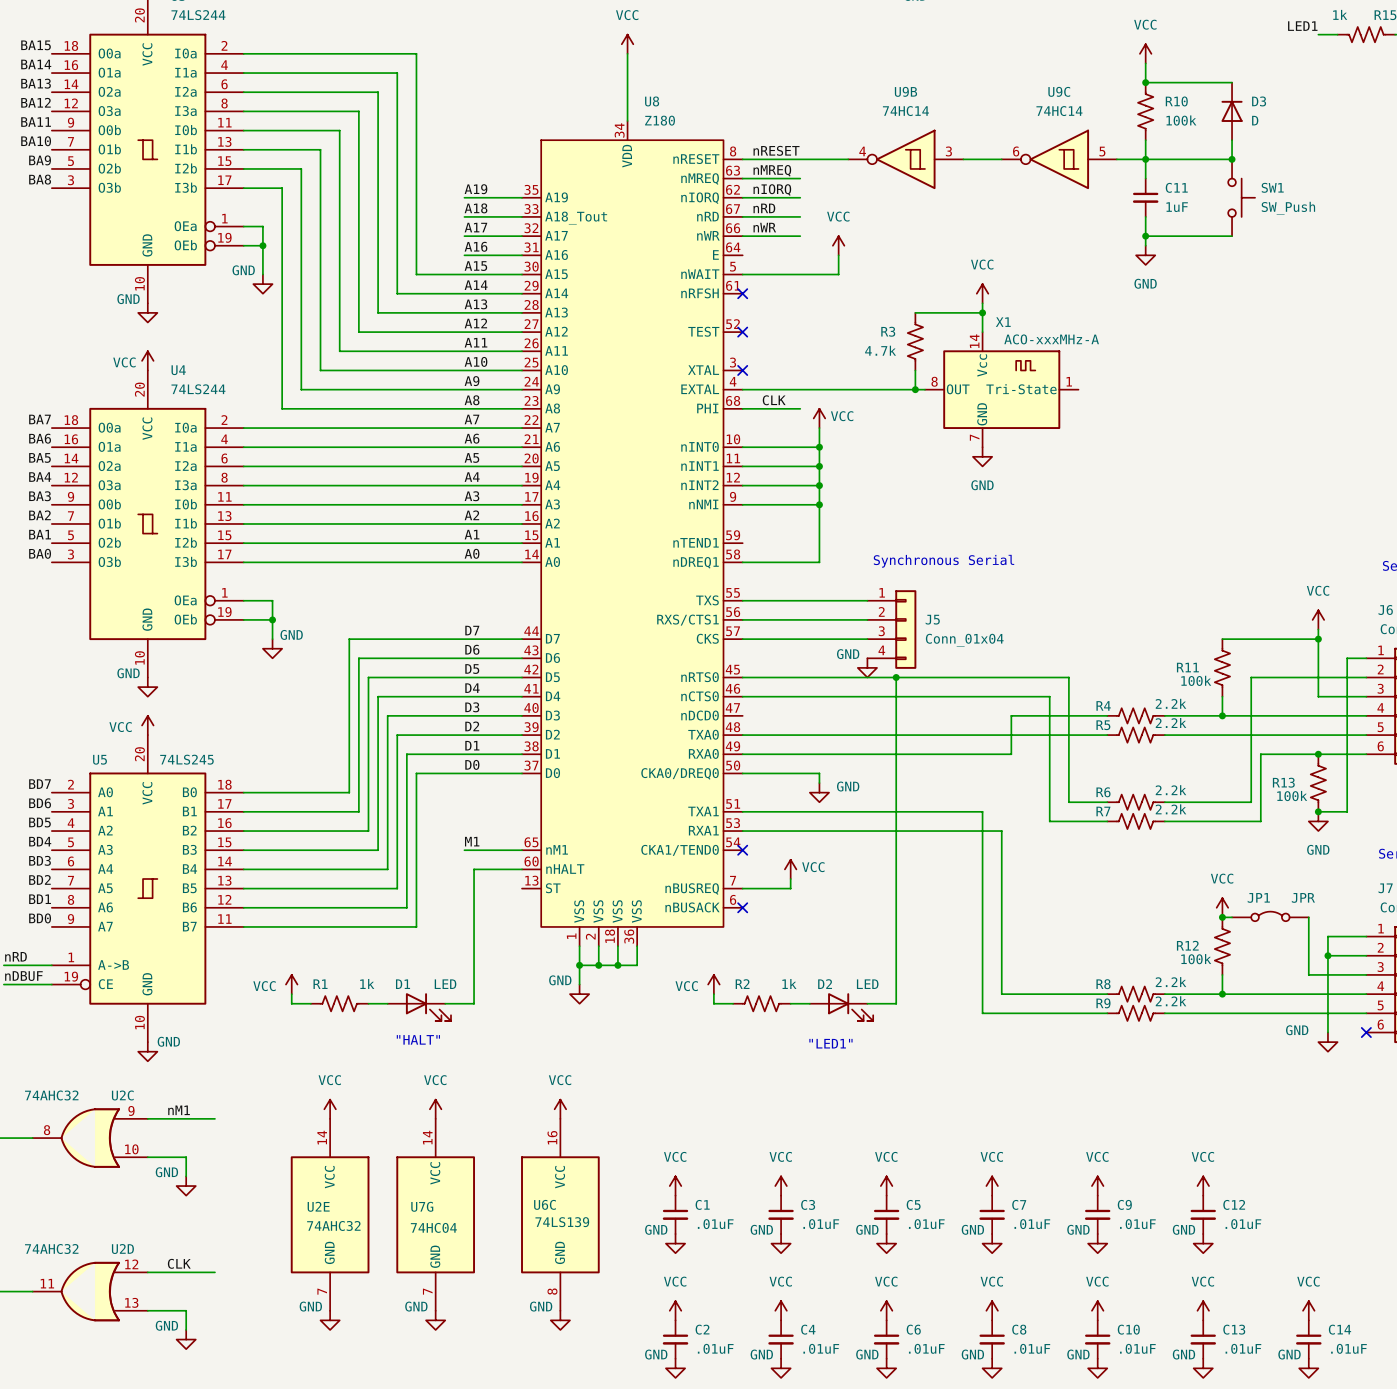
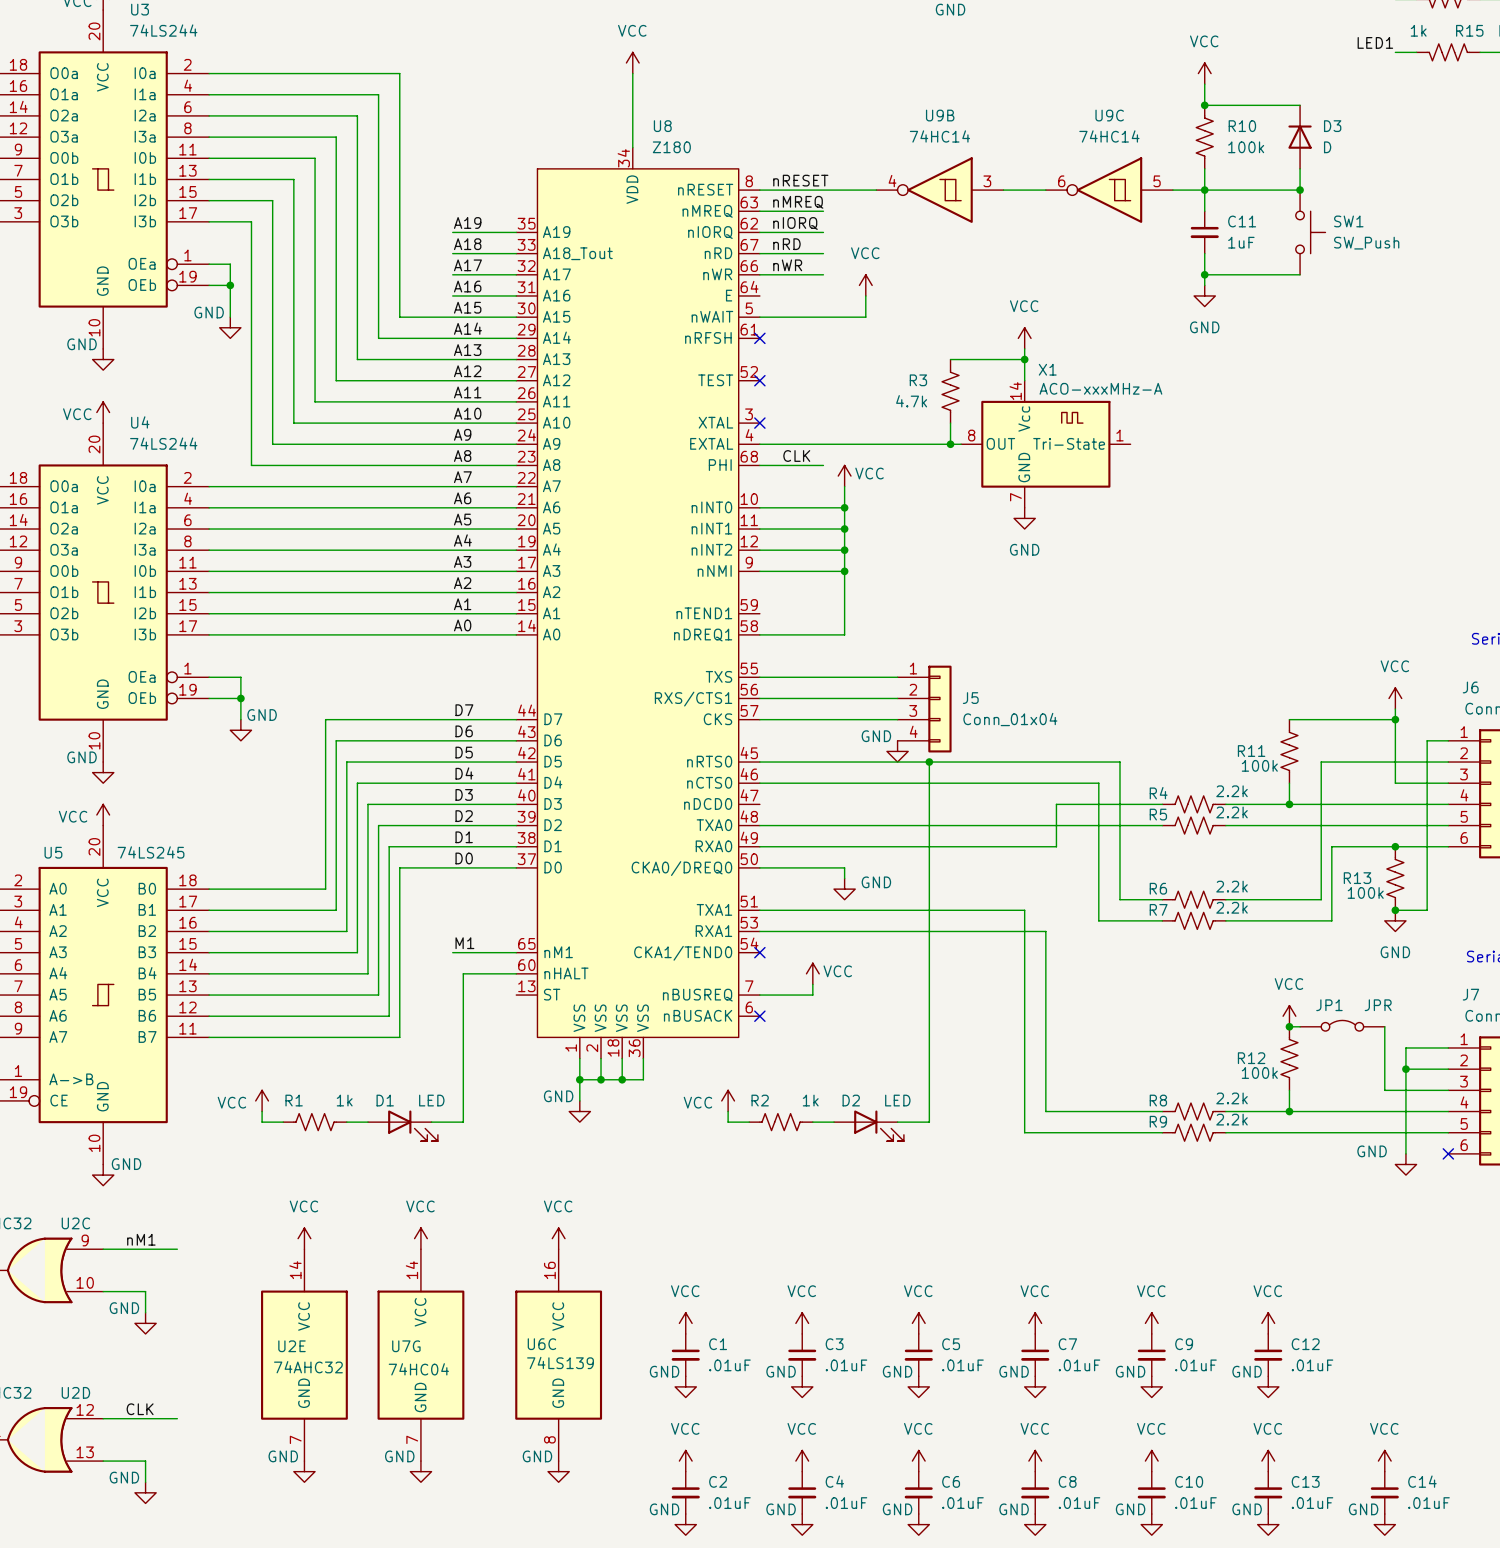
text: Synchronous Serial (943, 561) -> none
text: "HALT" (418, 1039) -> none
text: "LED1" (830, 1043) -> none

